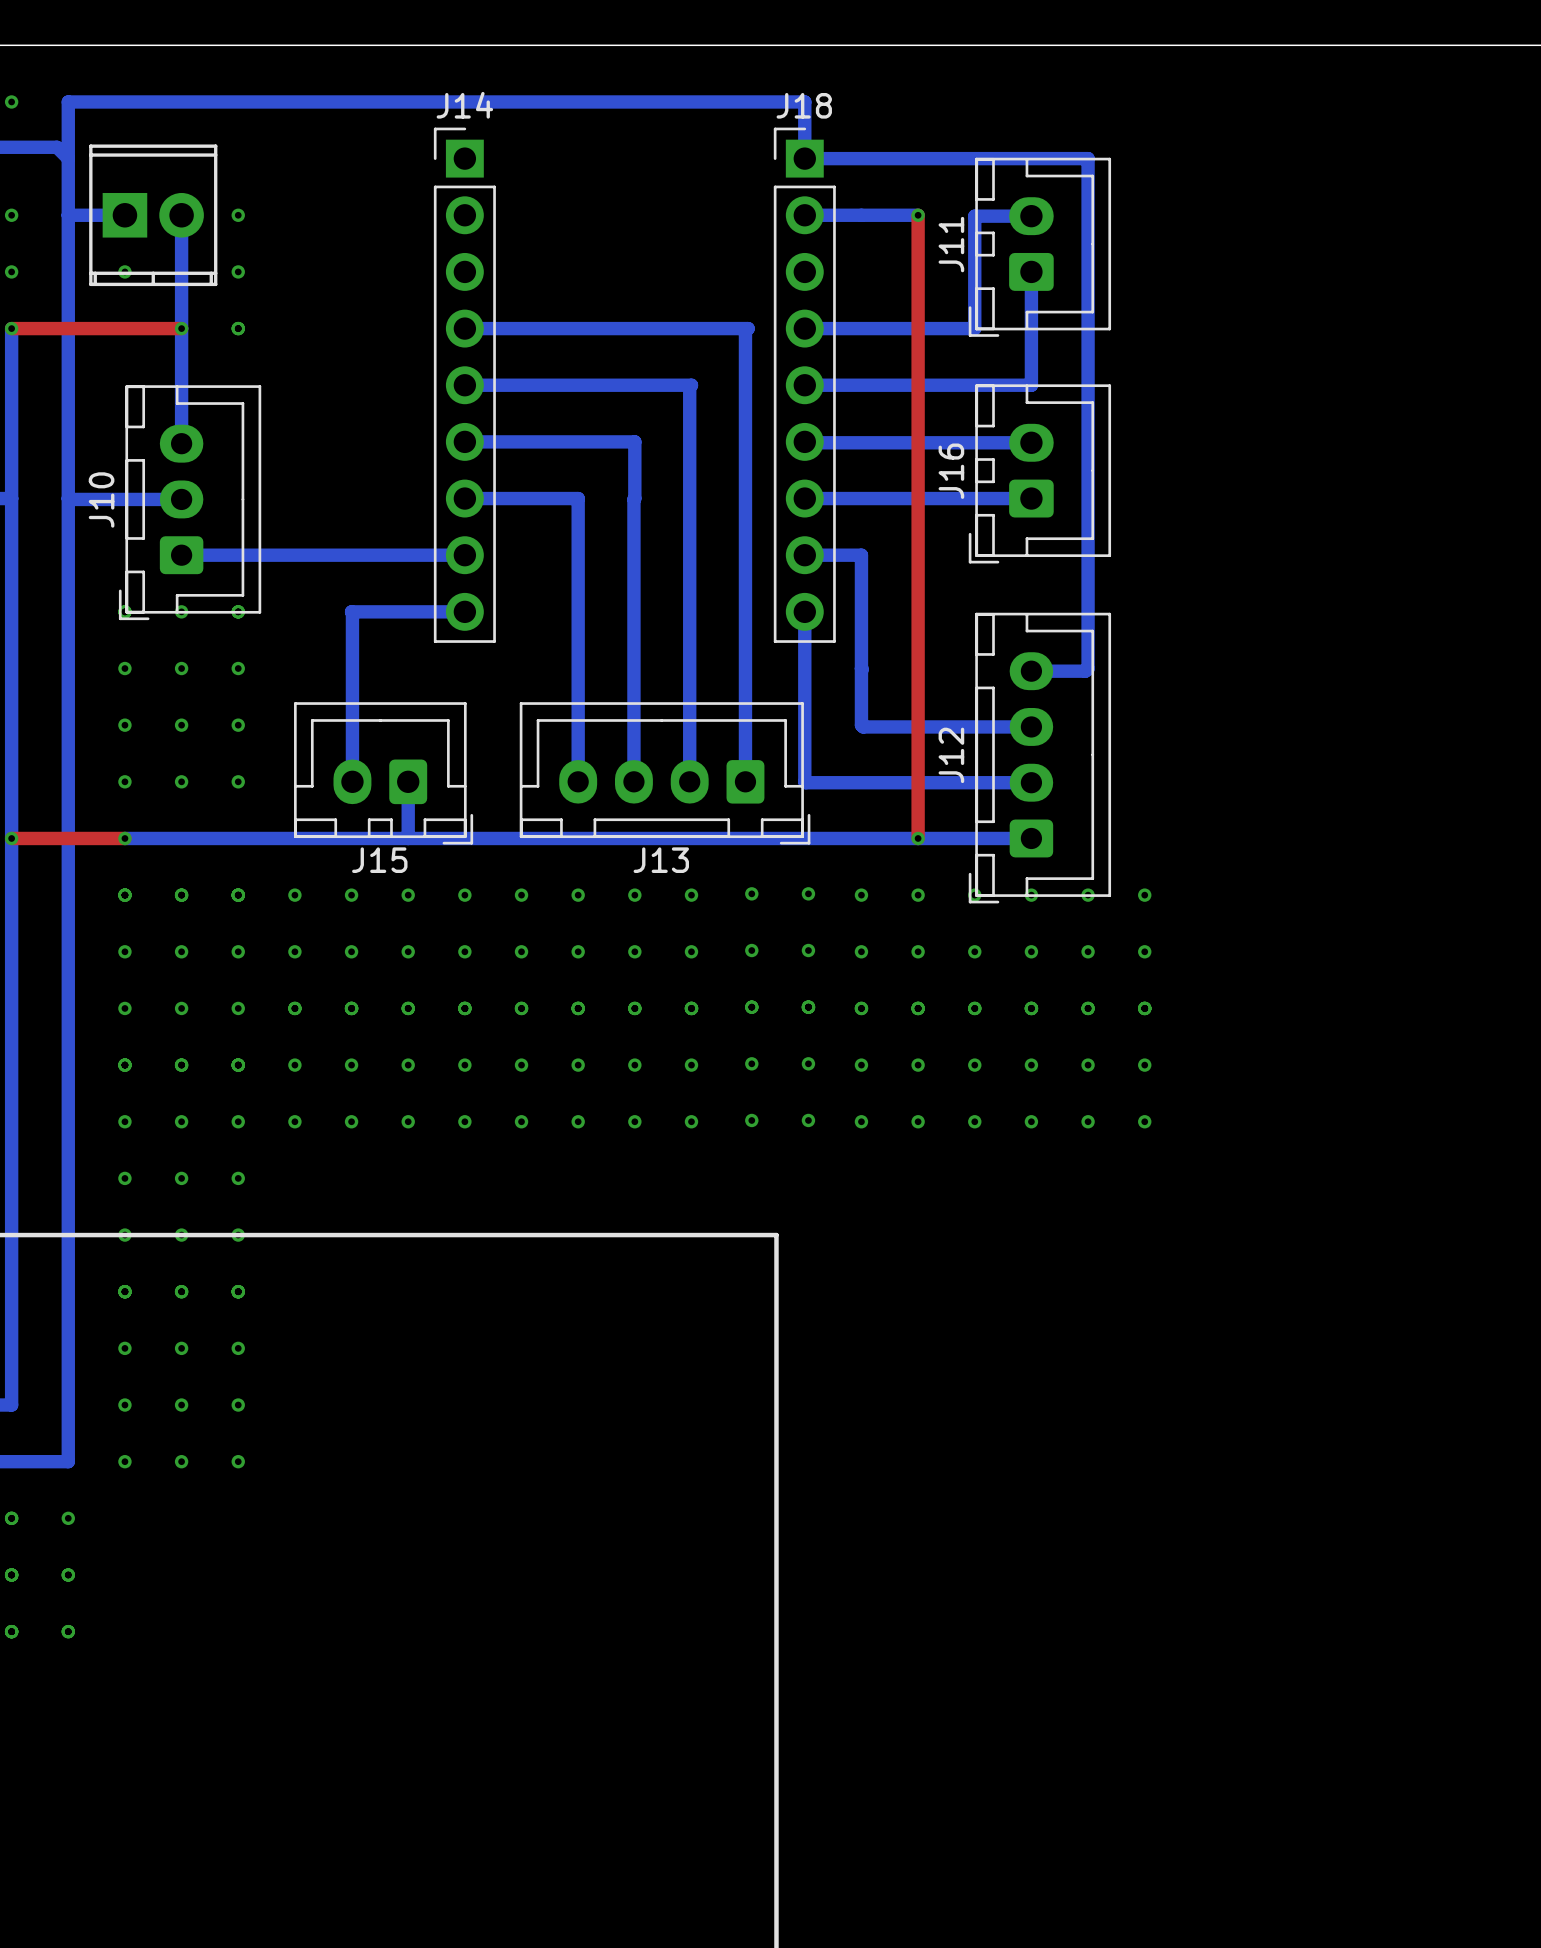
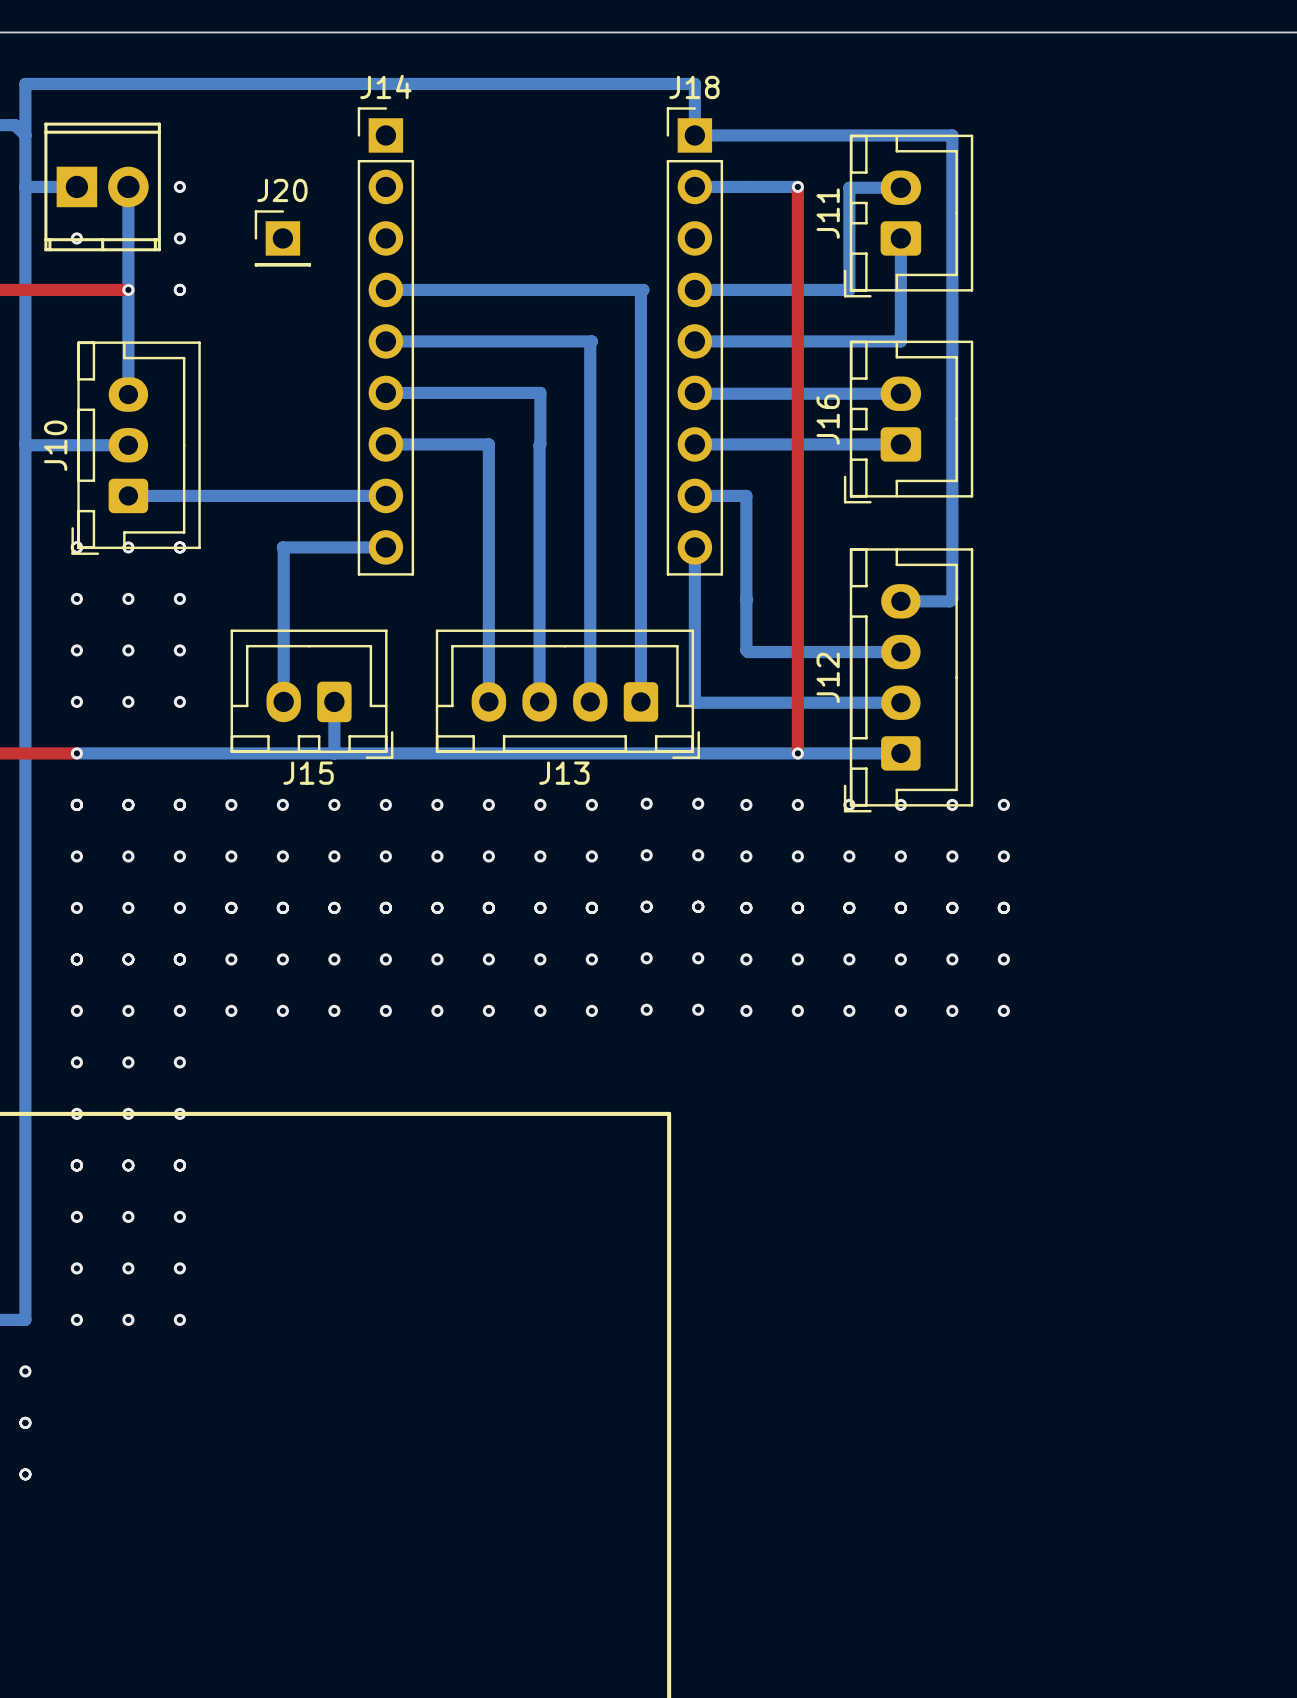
J20: none -> (282, 238)

